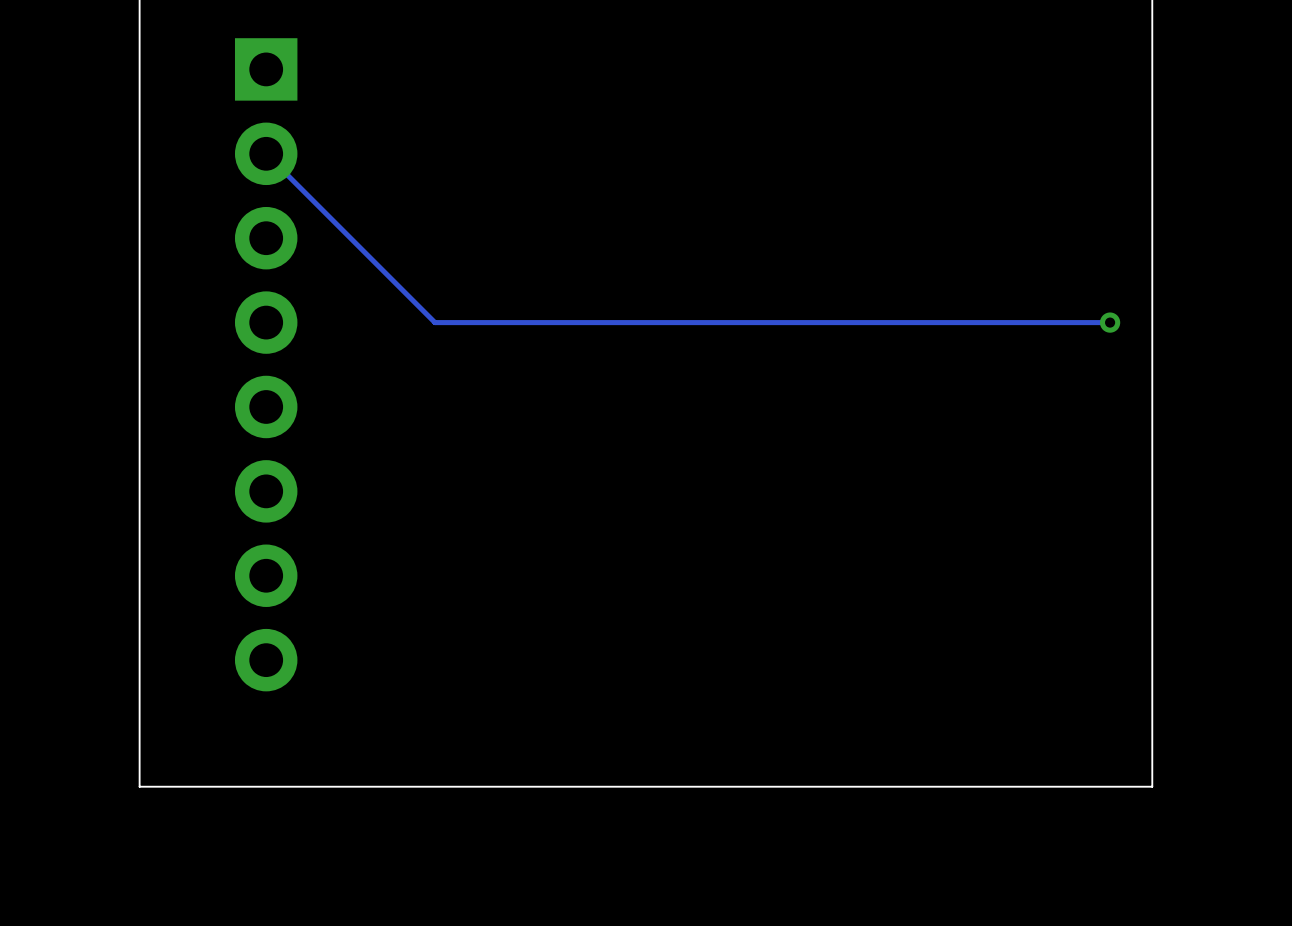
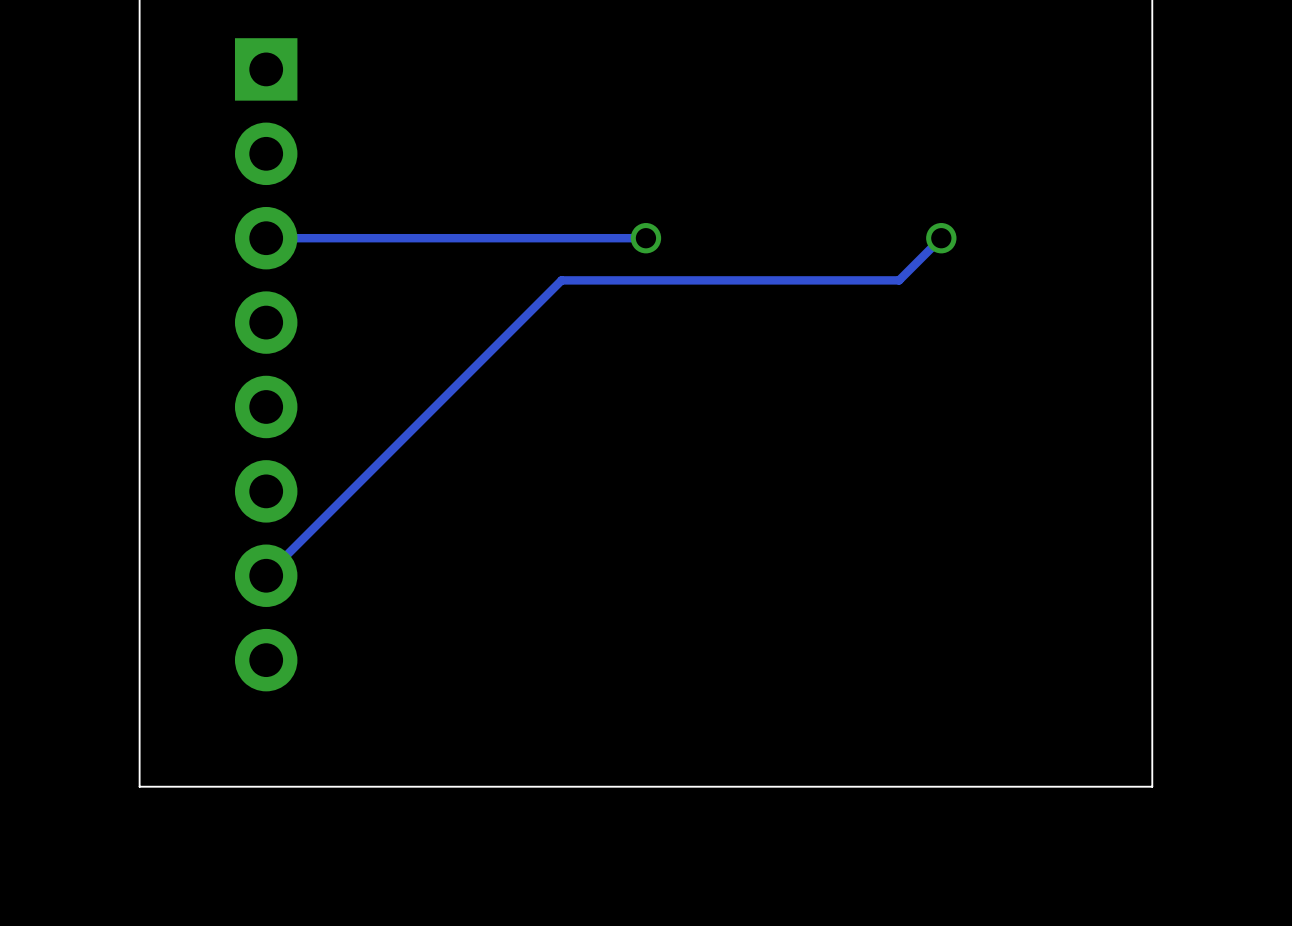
track: (266, 153) (434, 322) (1110, 322) -> none
track: none -> (645, 238) (266, 238)
via: none -> (645, 238)
track: none -> (941, 238) (899, 280) (561, 280) (266, 575)
via: none -> (941, 238)
via: (1110, 322) -> none

